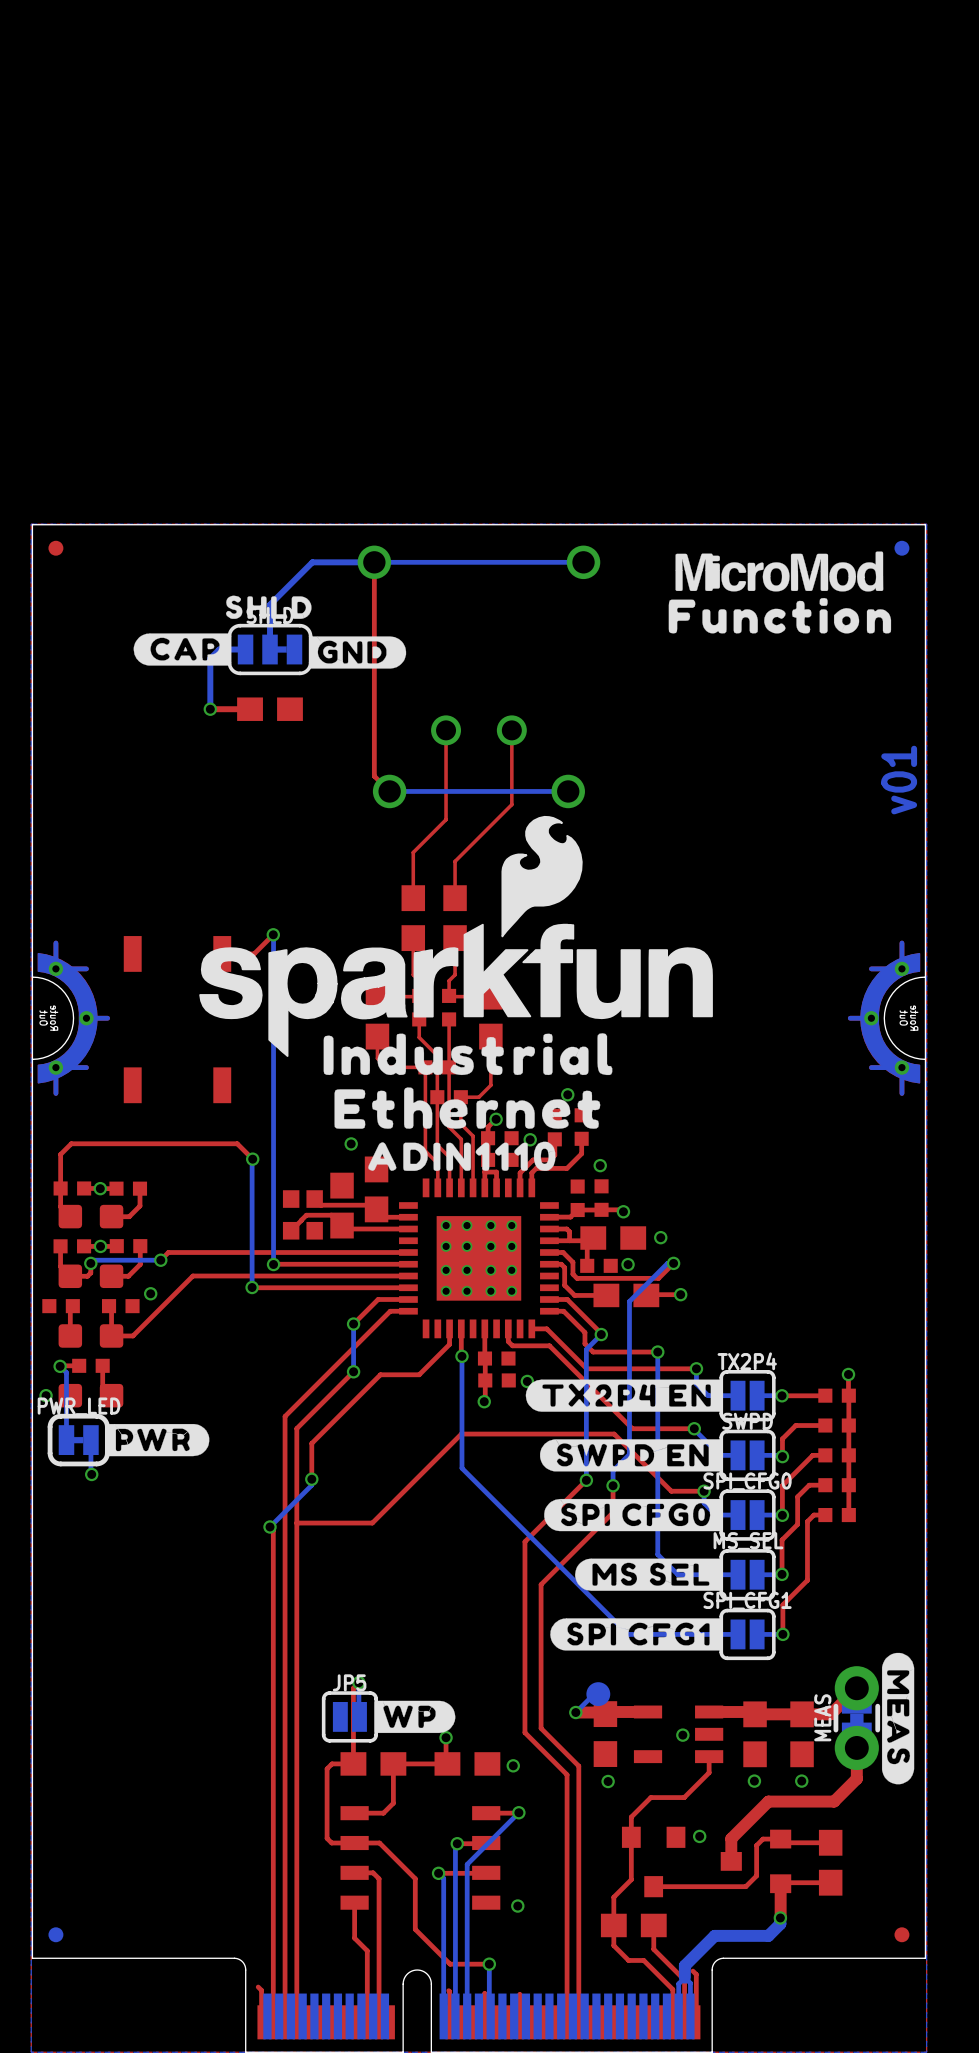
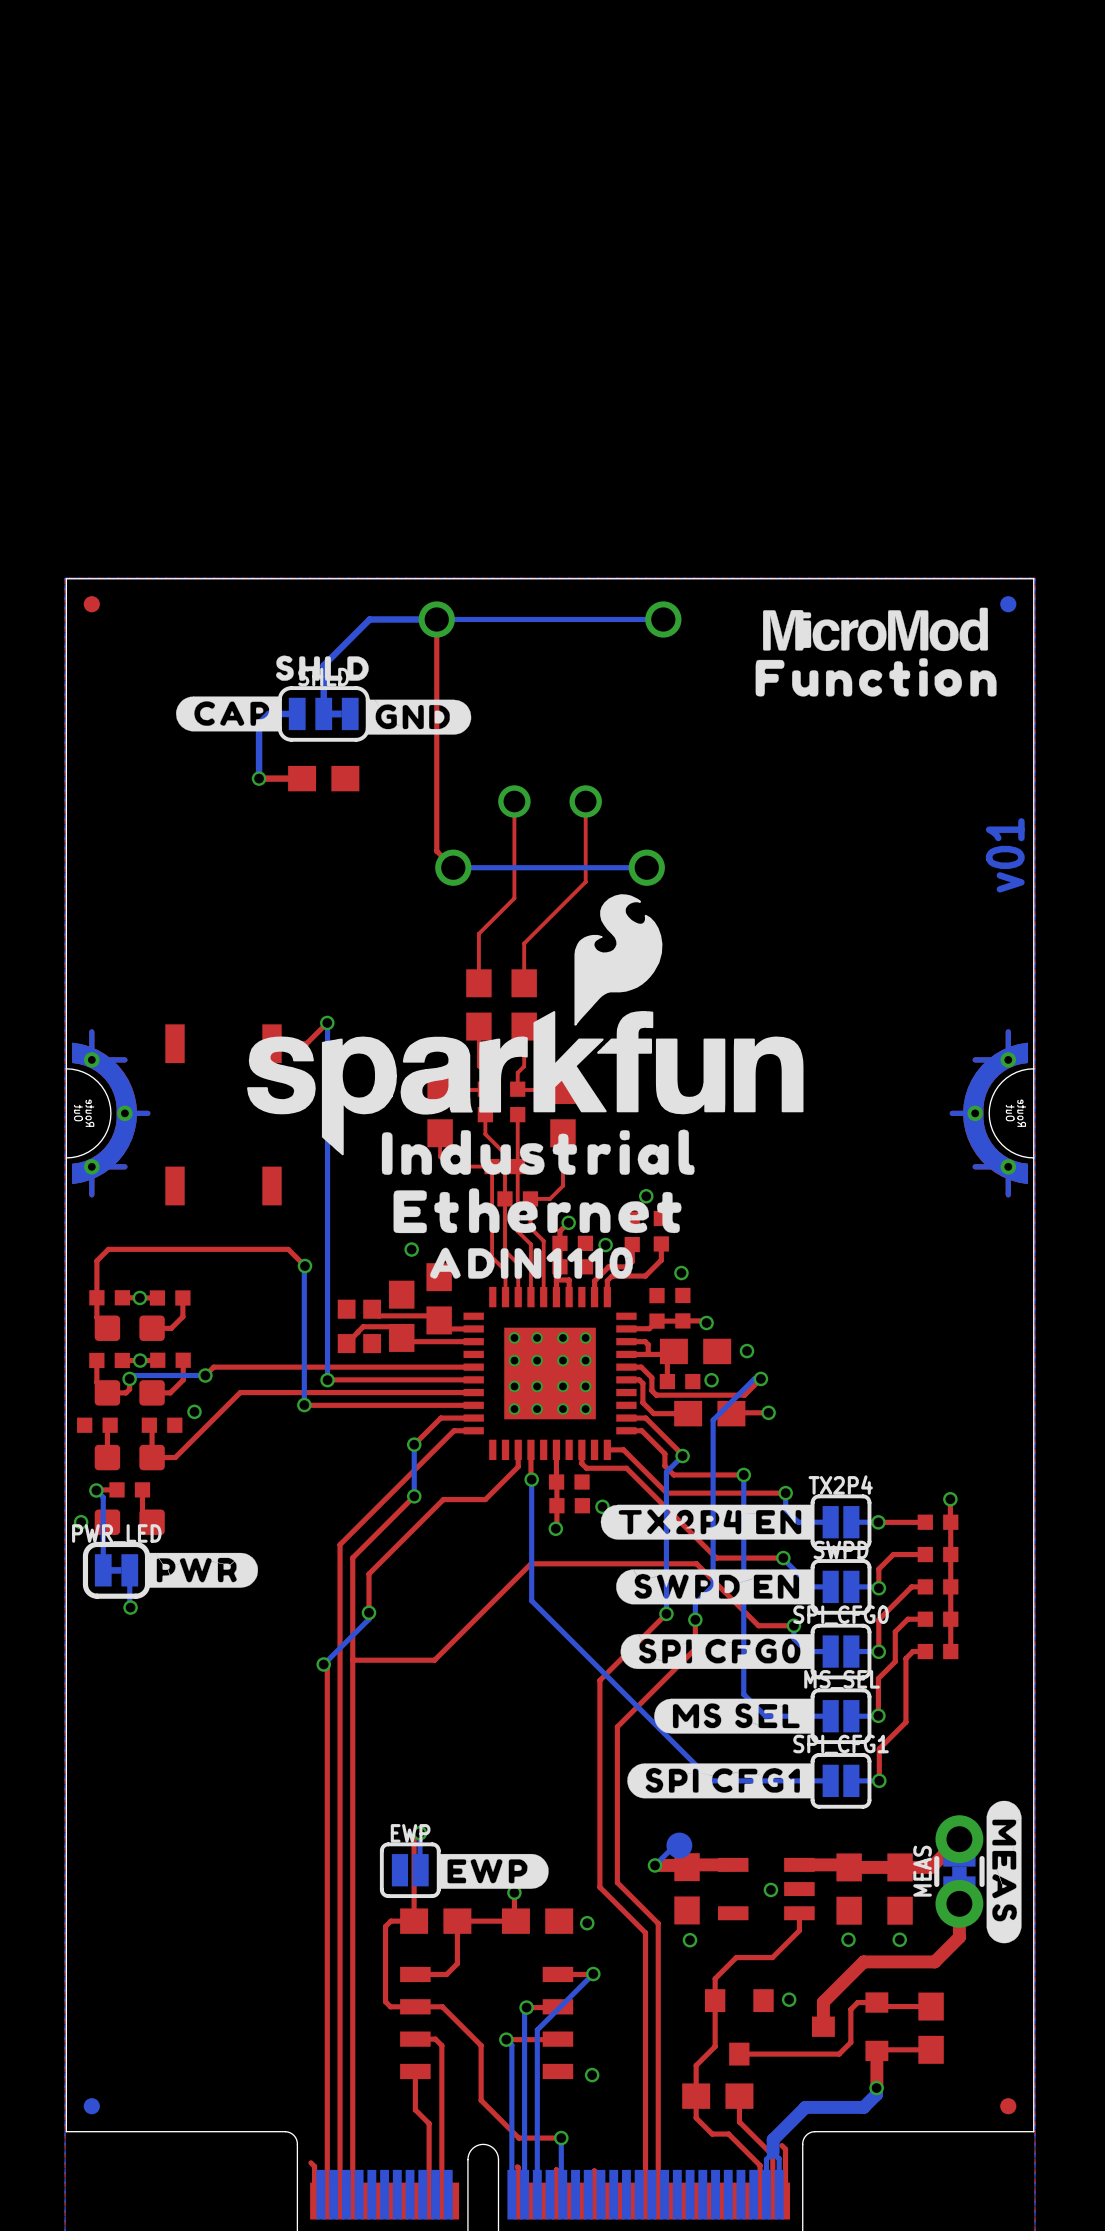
JP5 name: JP5 (349, 1682) -> EWP (410, 1833)
drawing shape: [374, 1700, 456, 1734] -> [437, 1853, 549, 1889]

